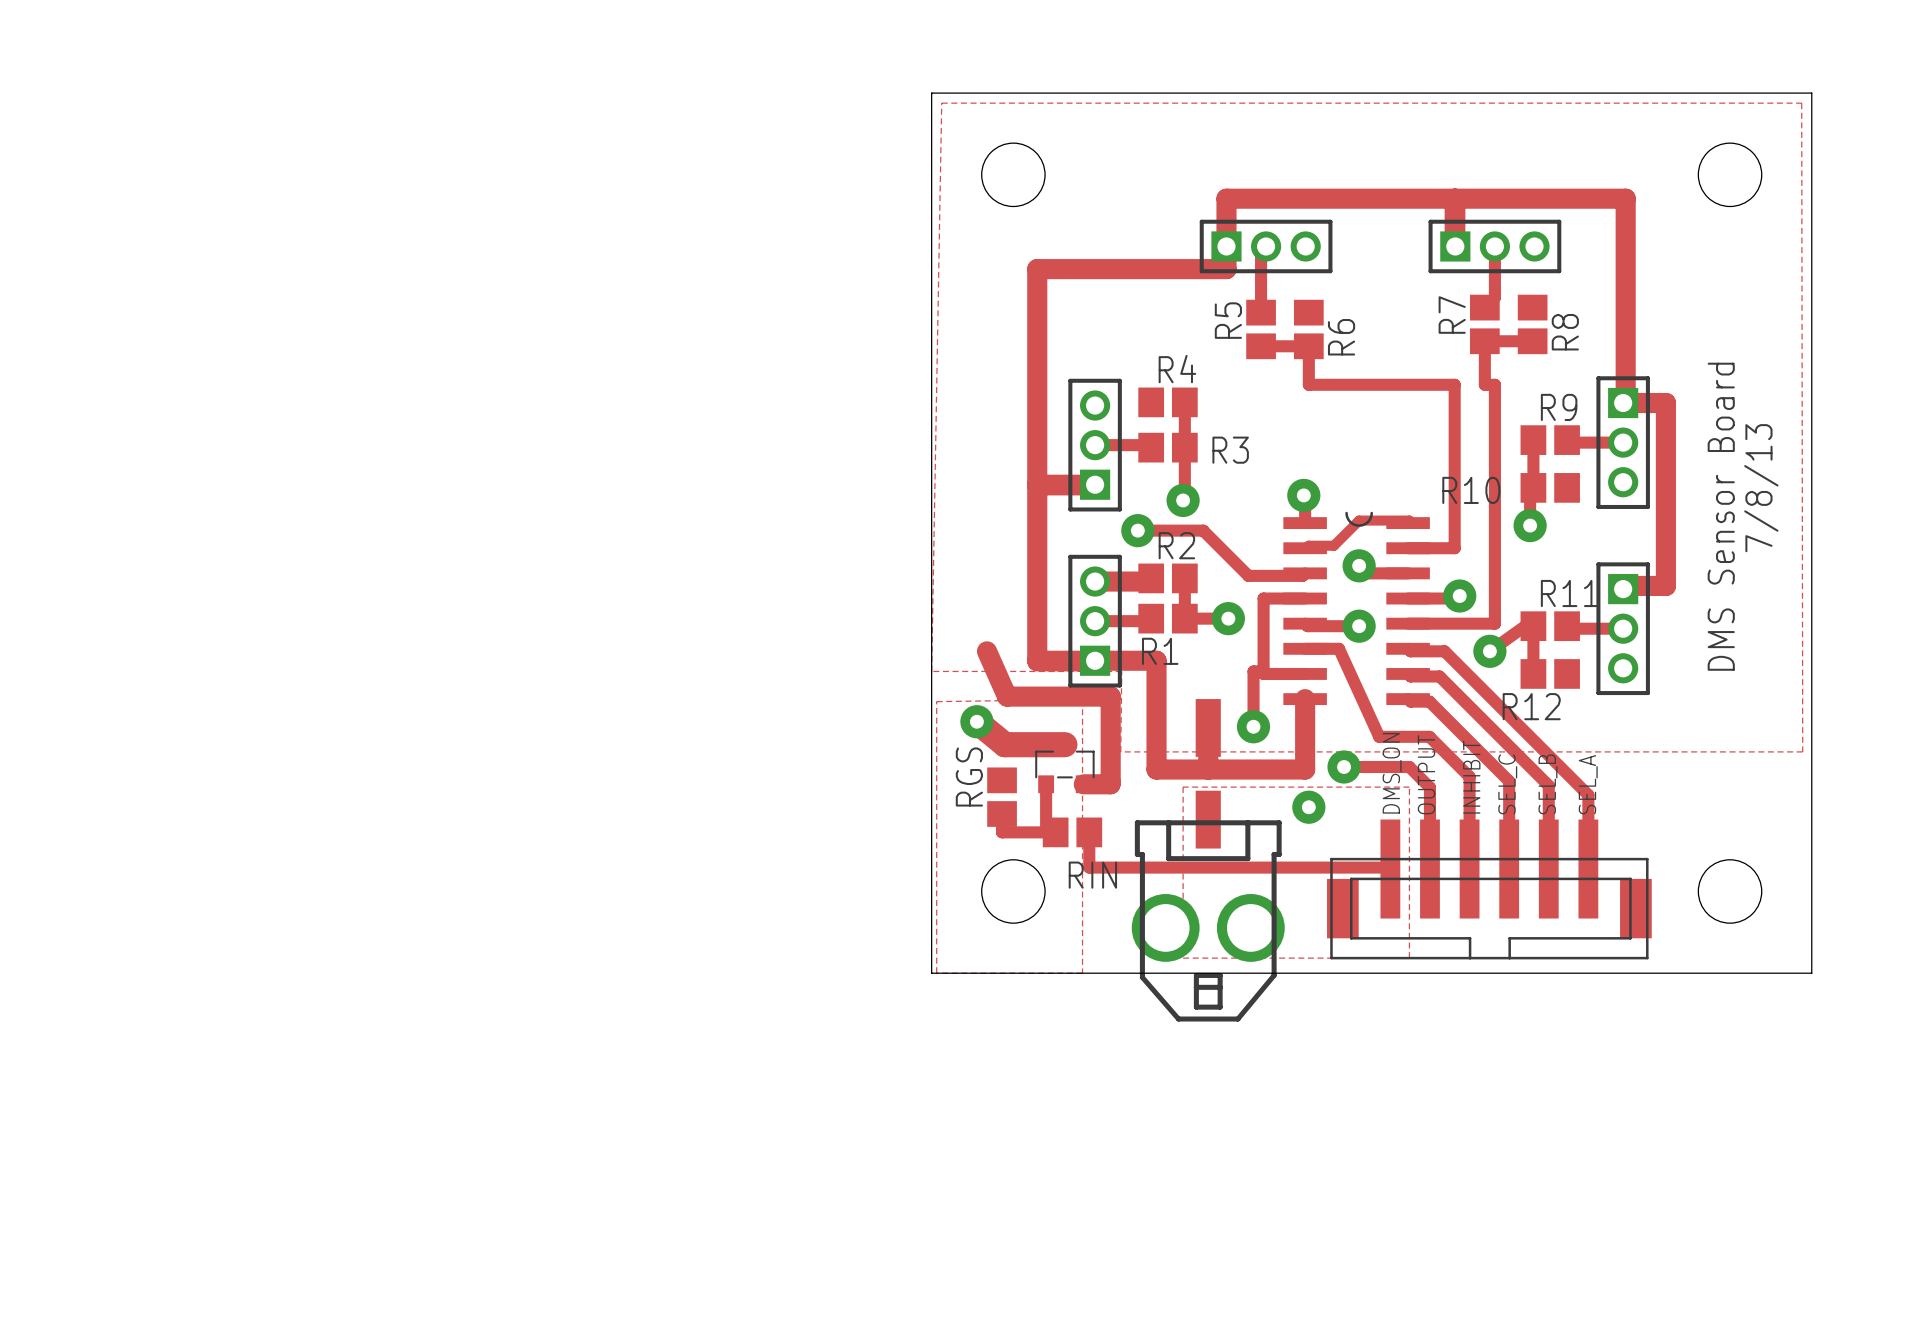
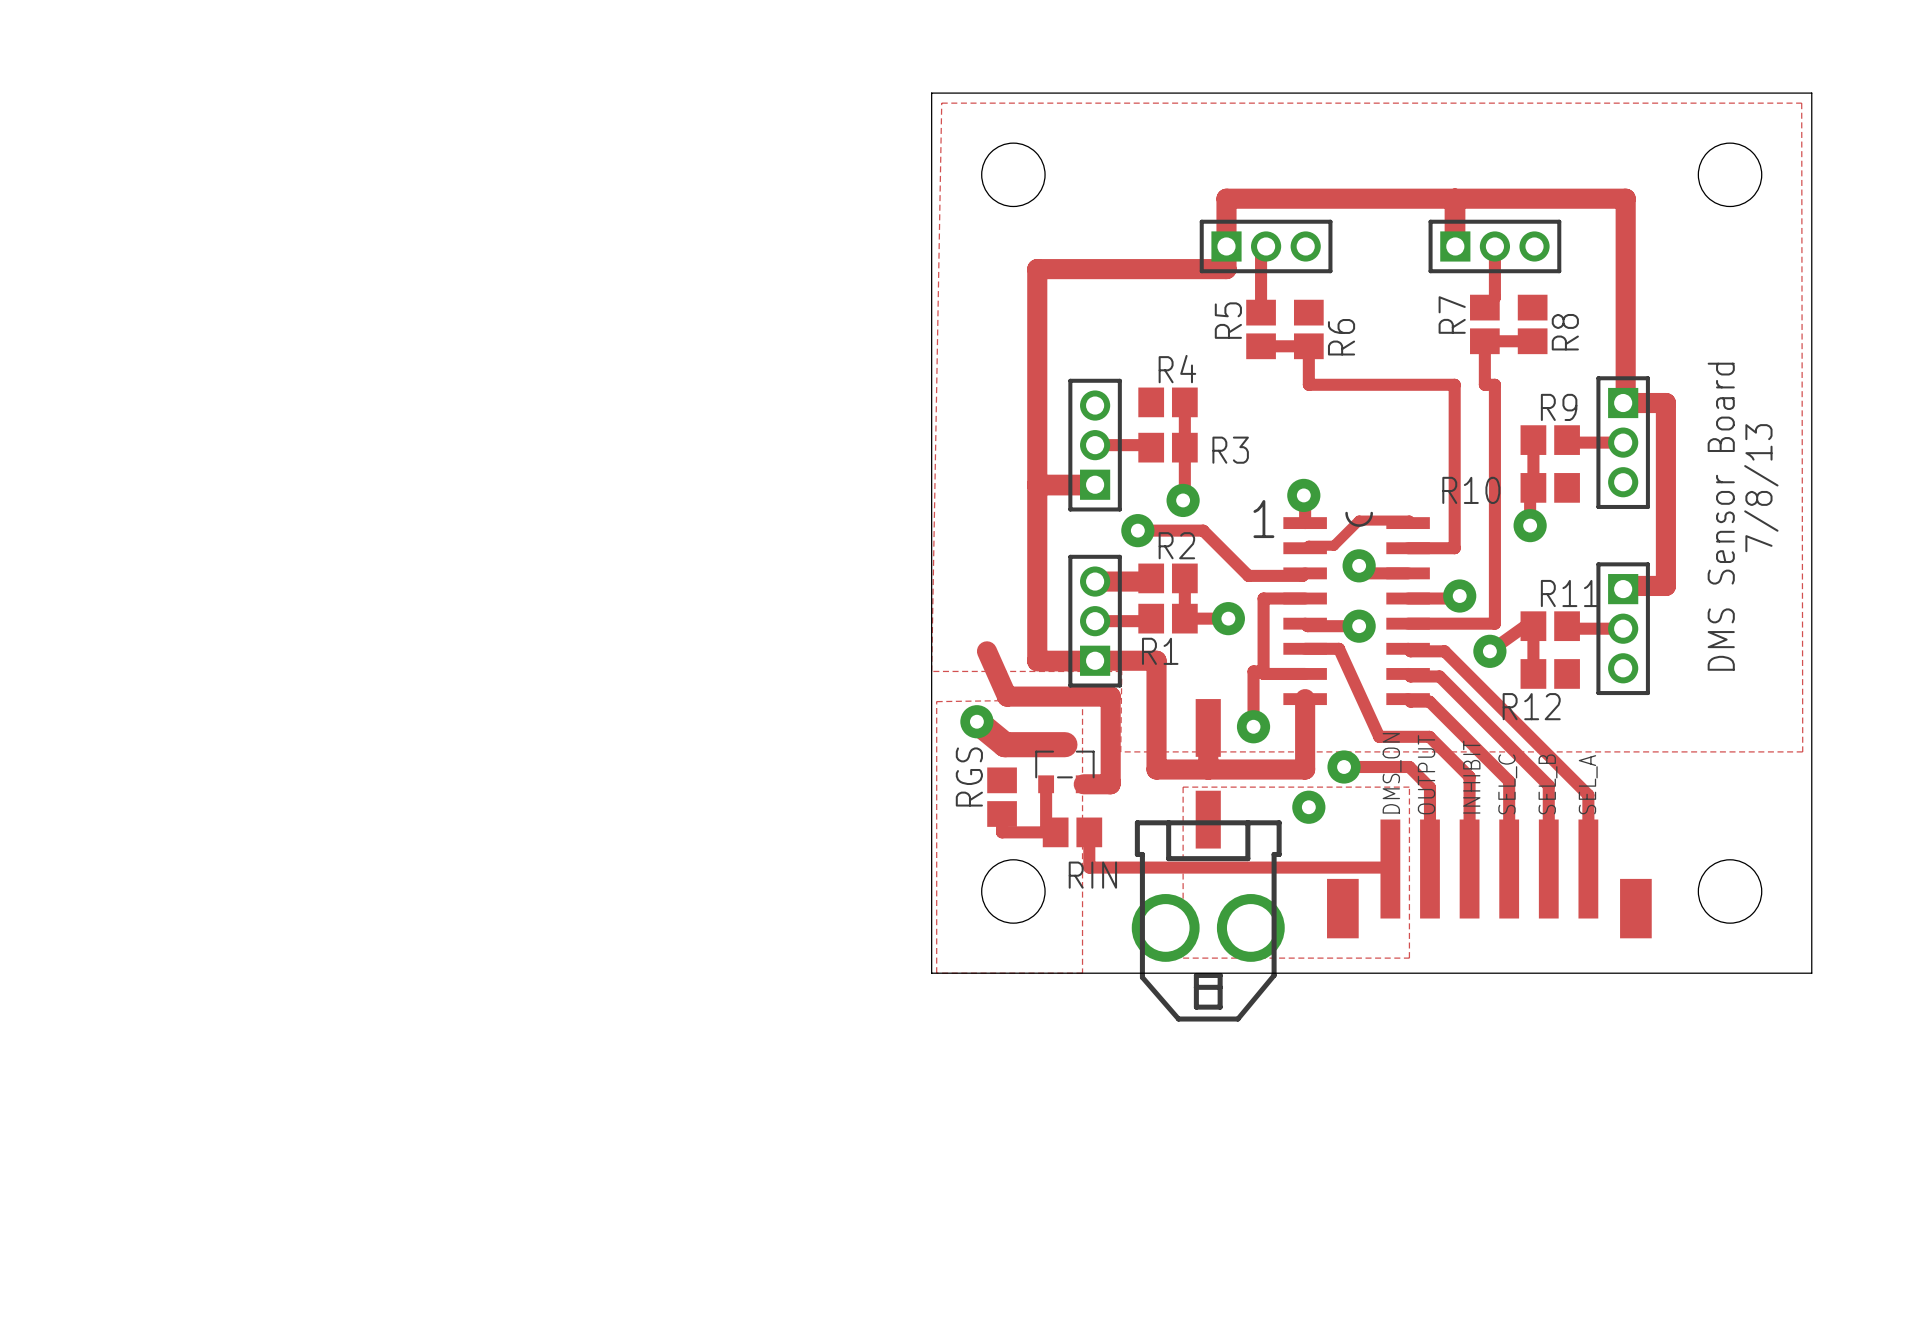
text: none -> 1 (1263, 519)
part footprint: [1327, 819, 1652, 960] -> [1327, 819, 1652, 939]

